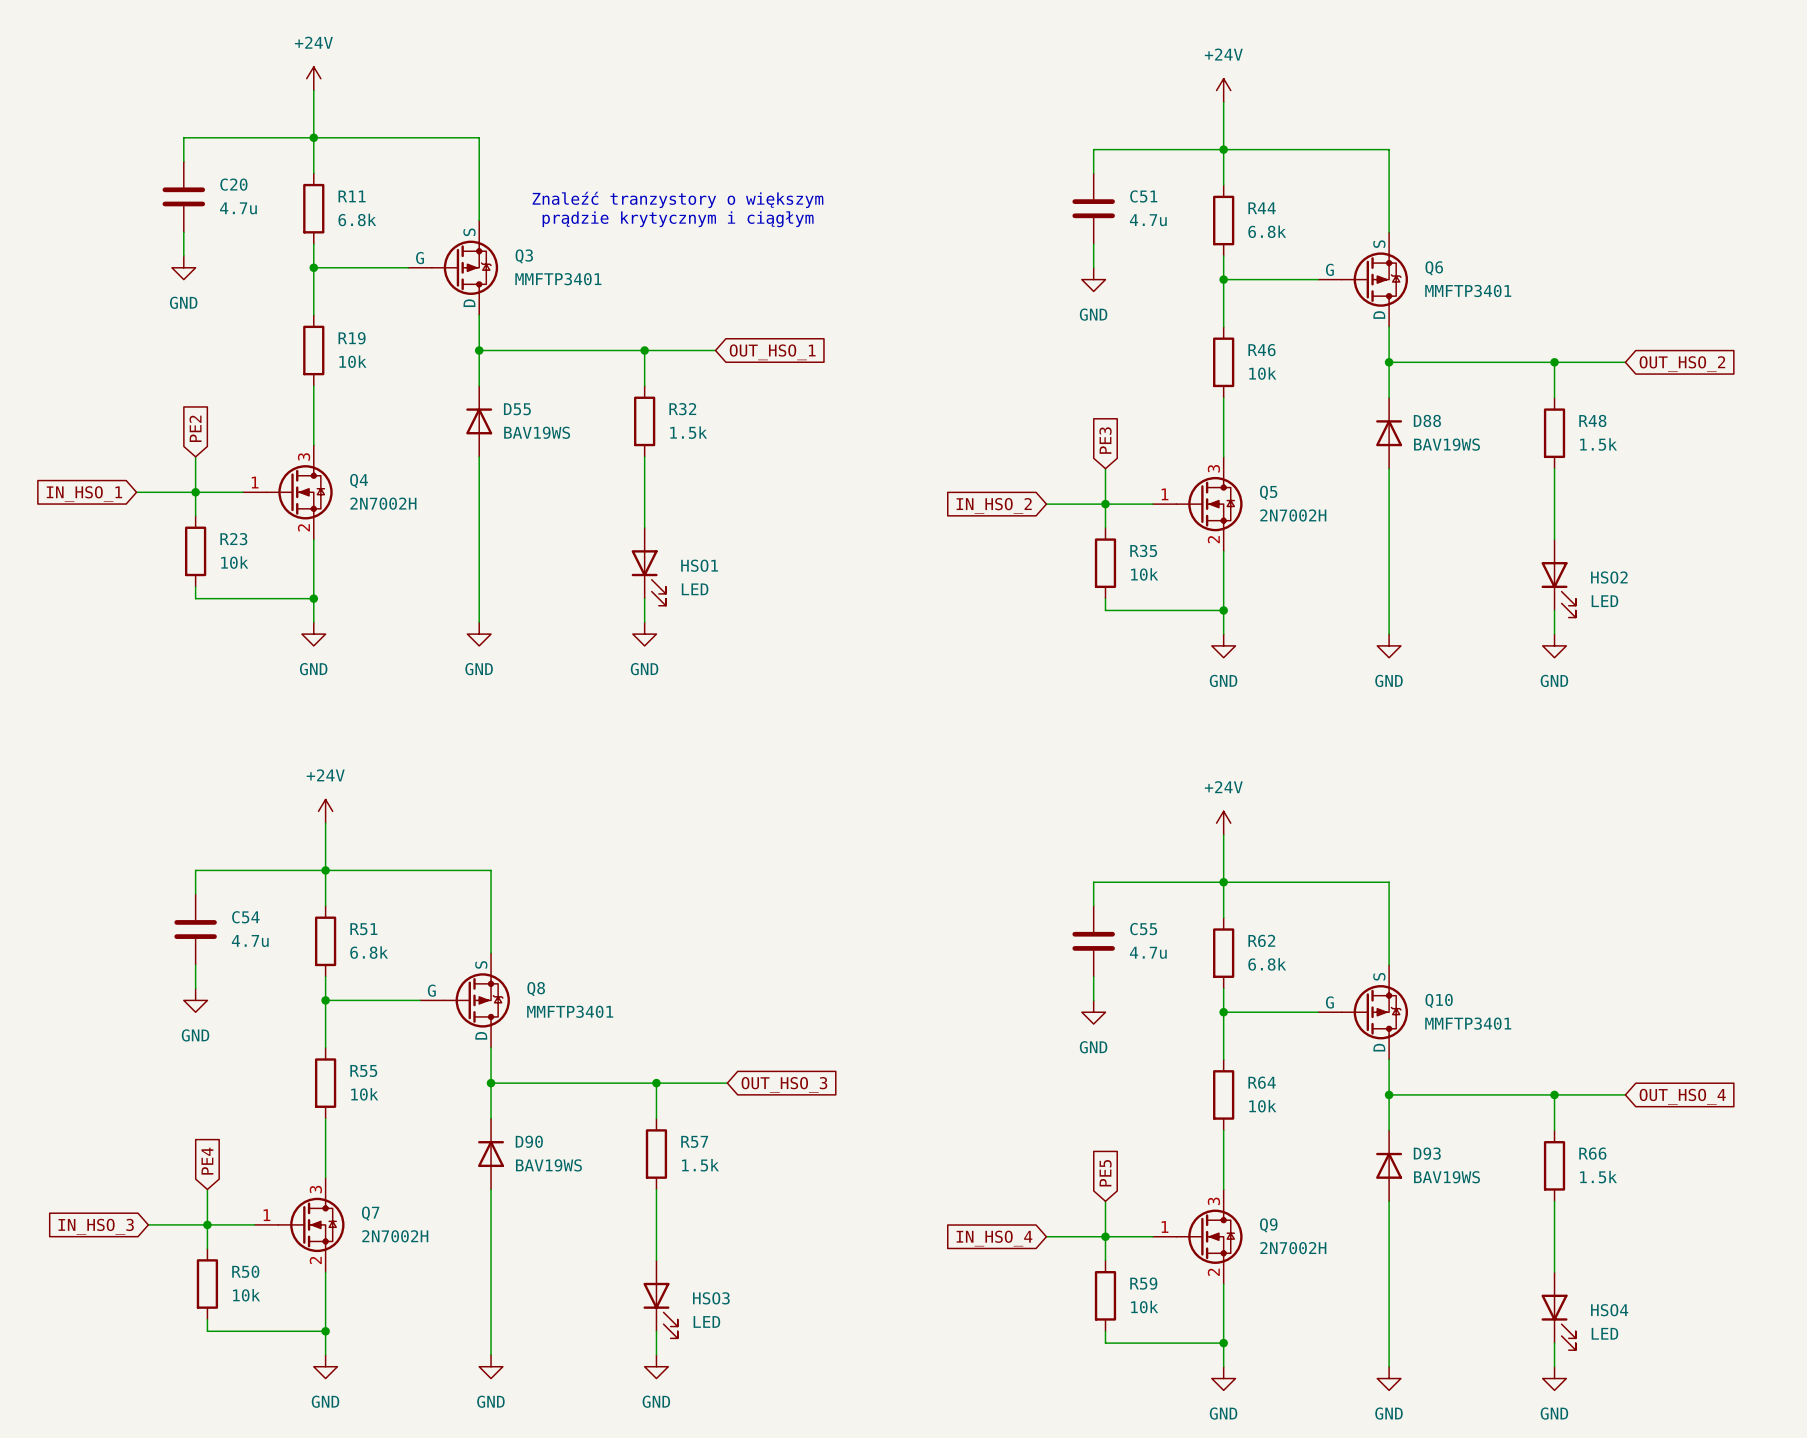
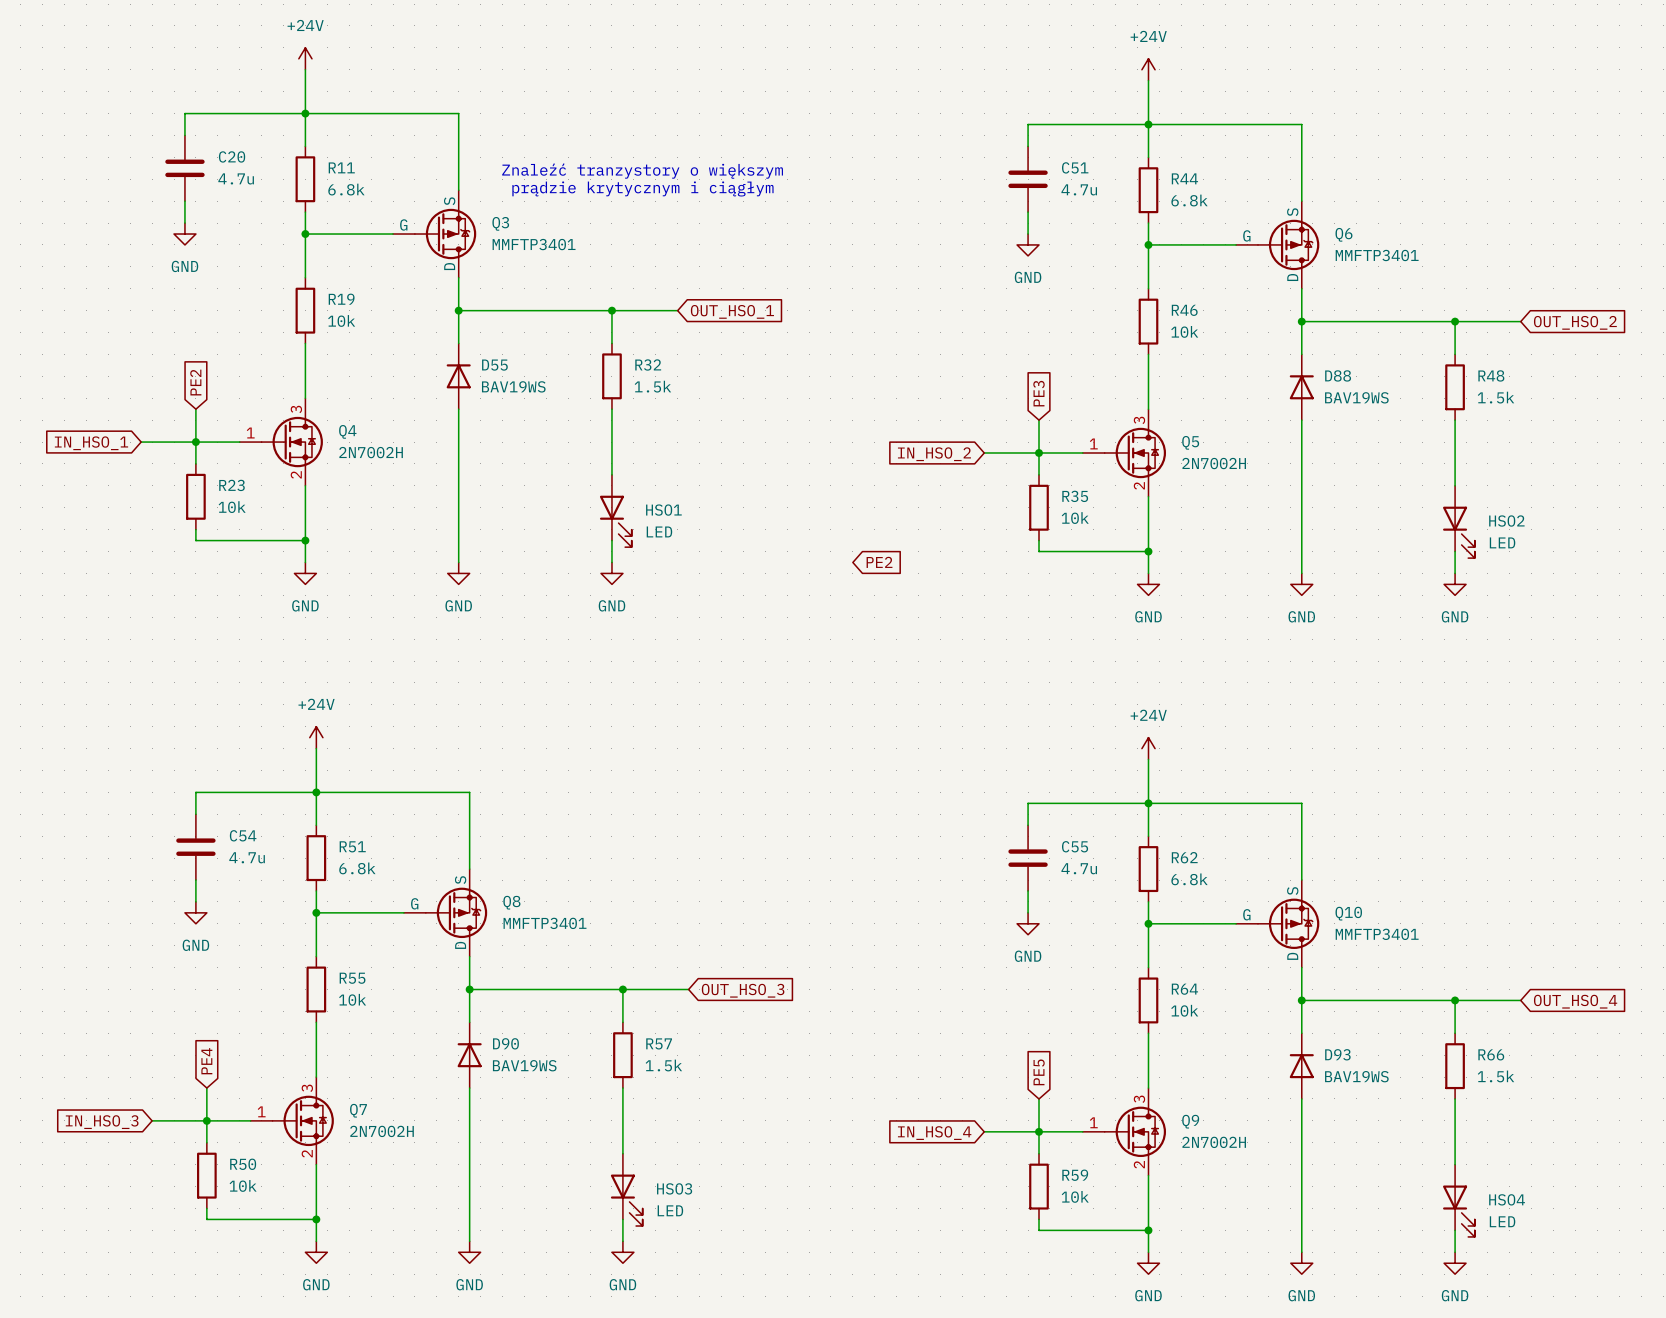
global label: none -> PE2 (879, 562)

